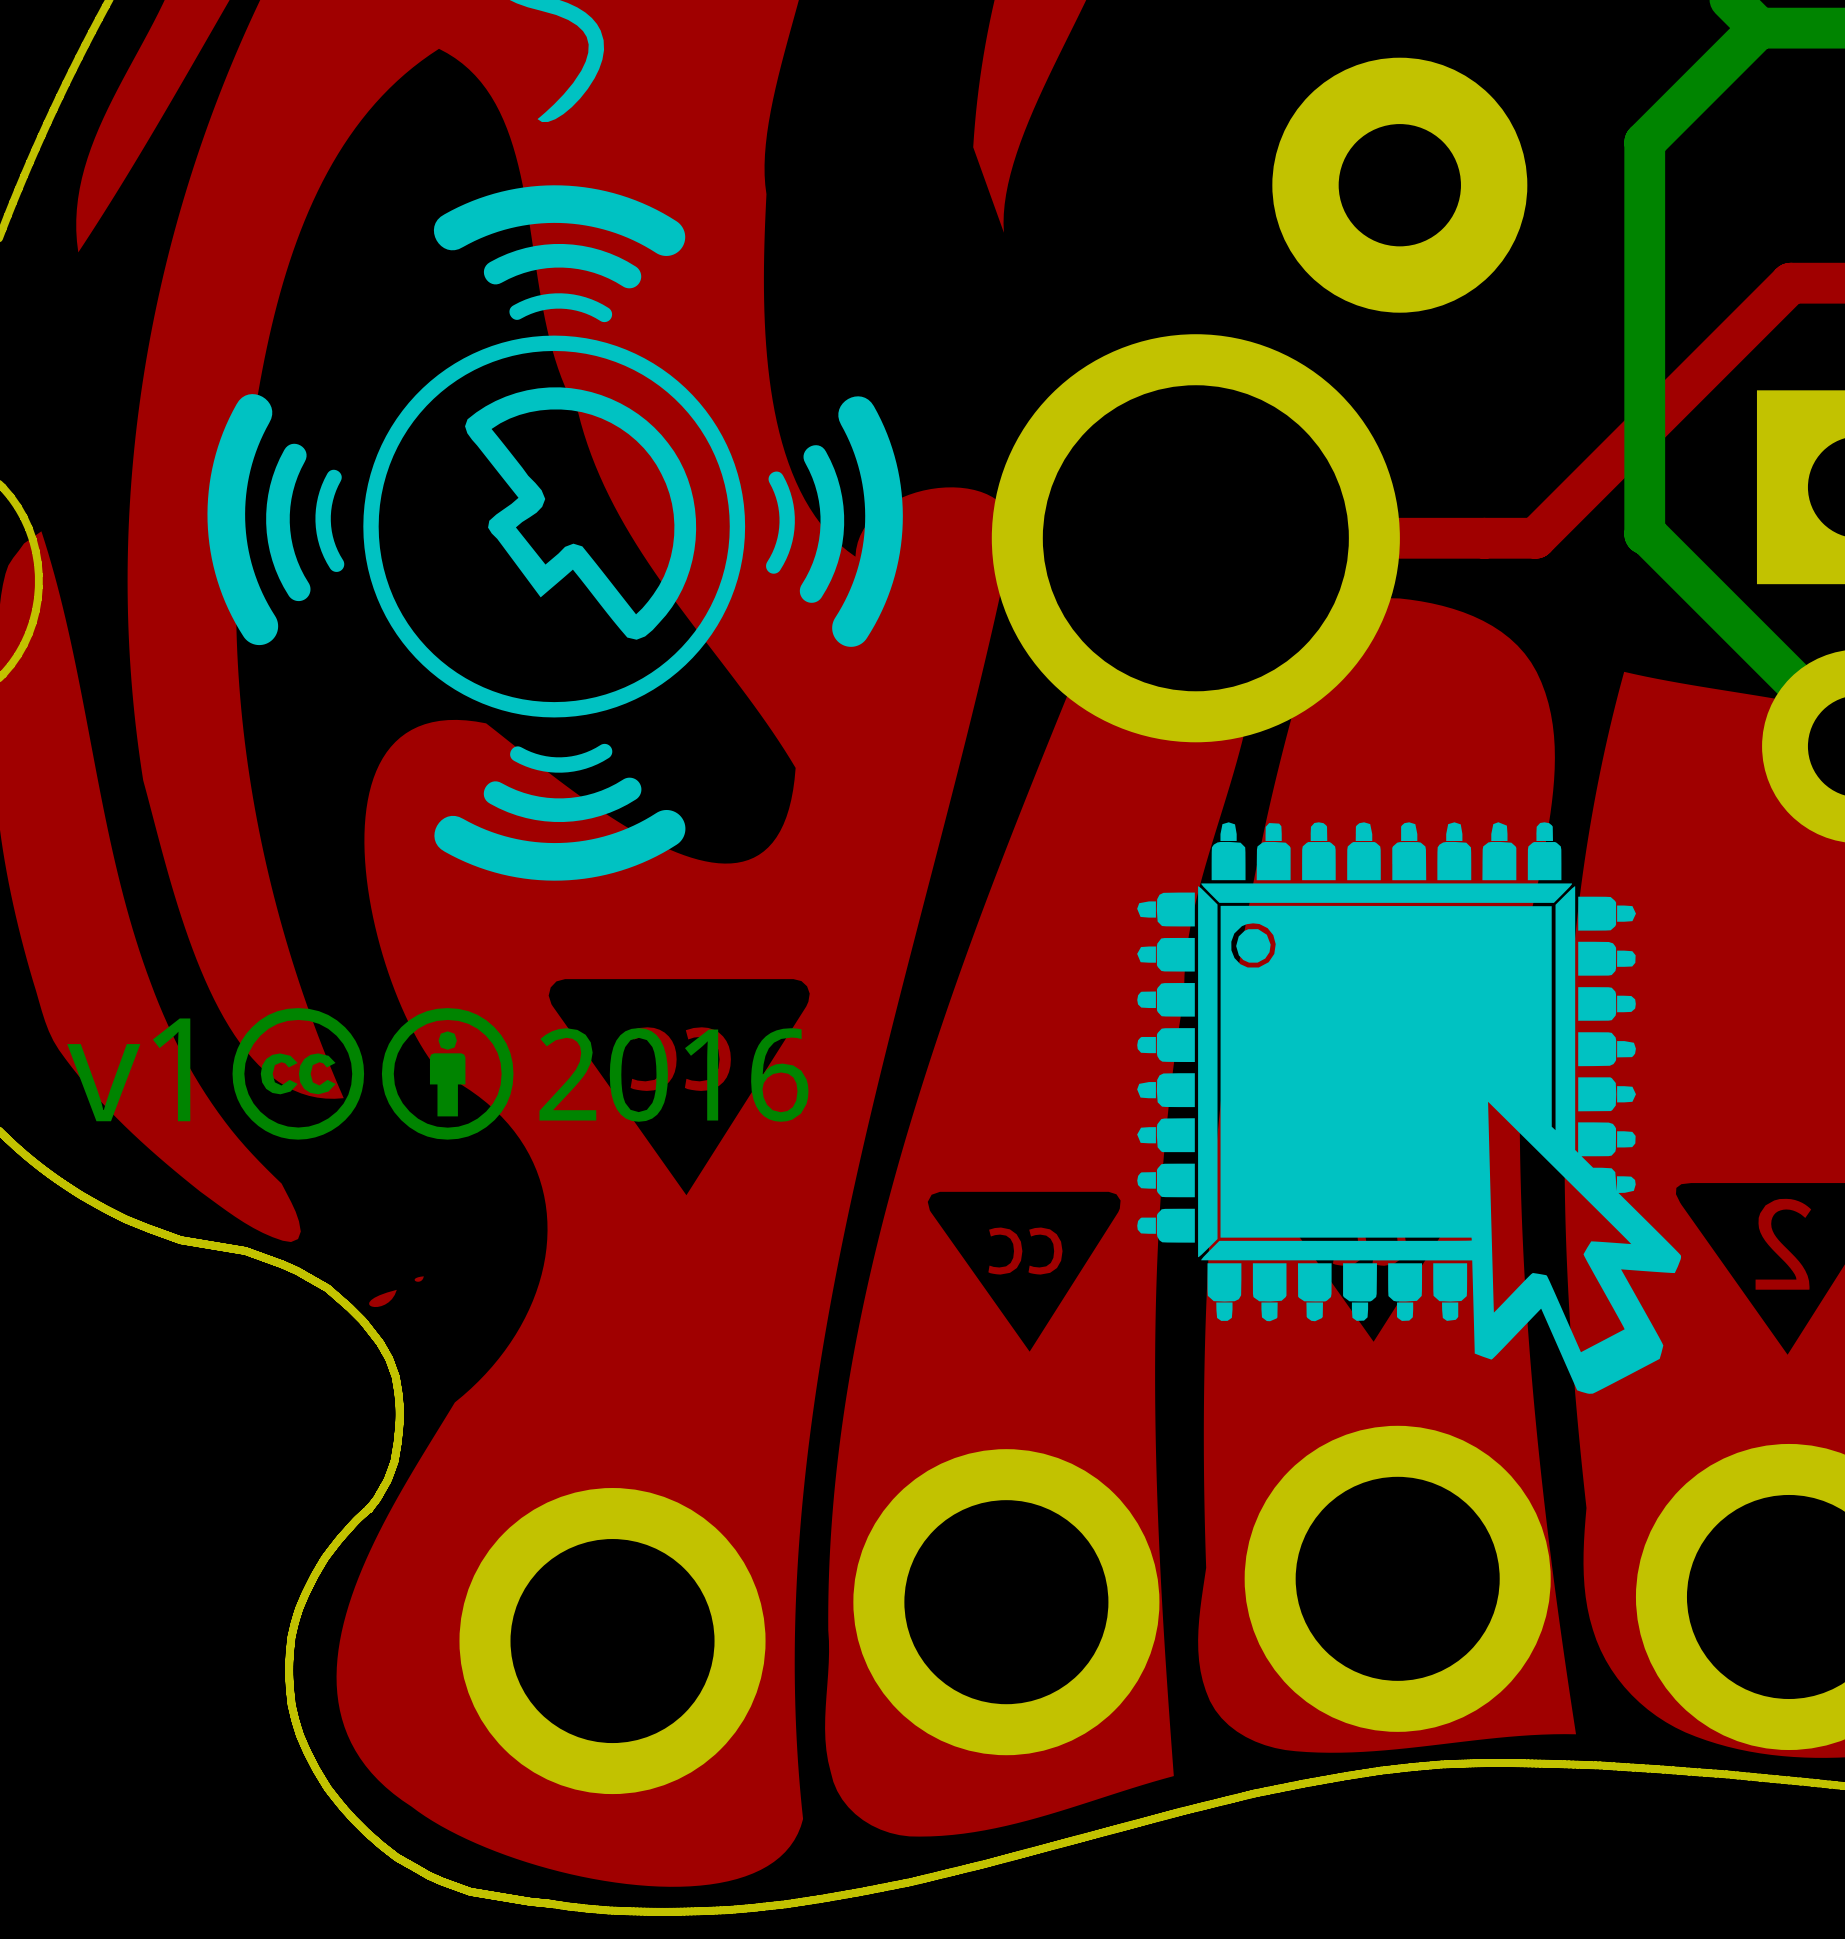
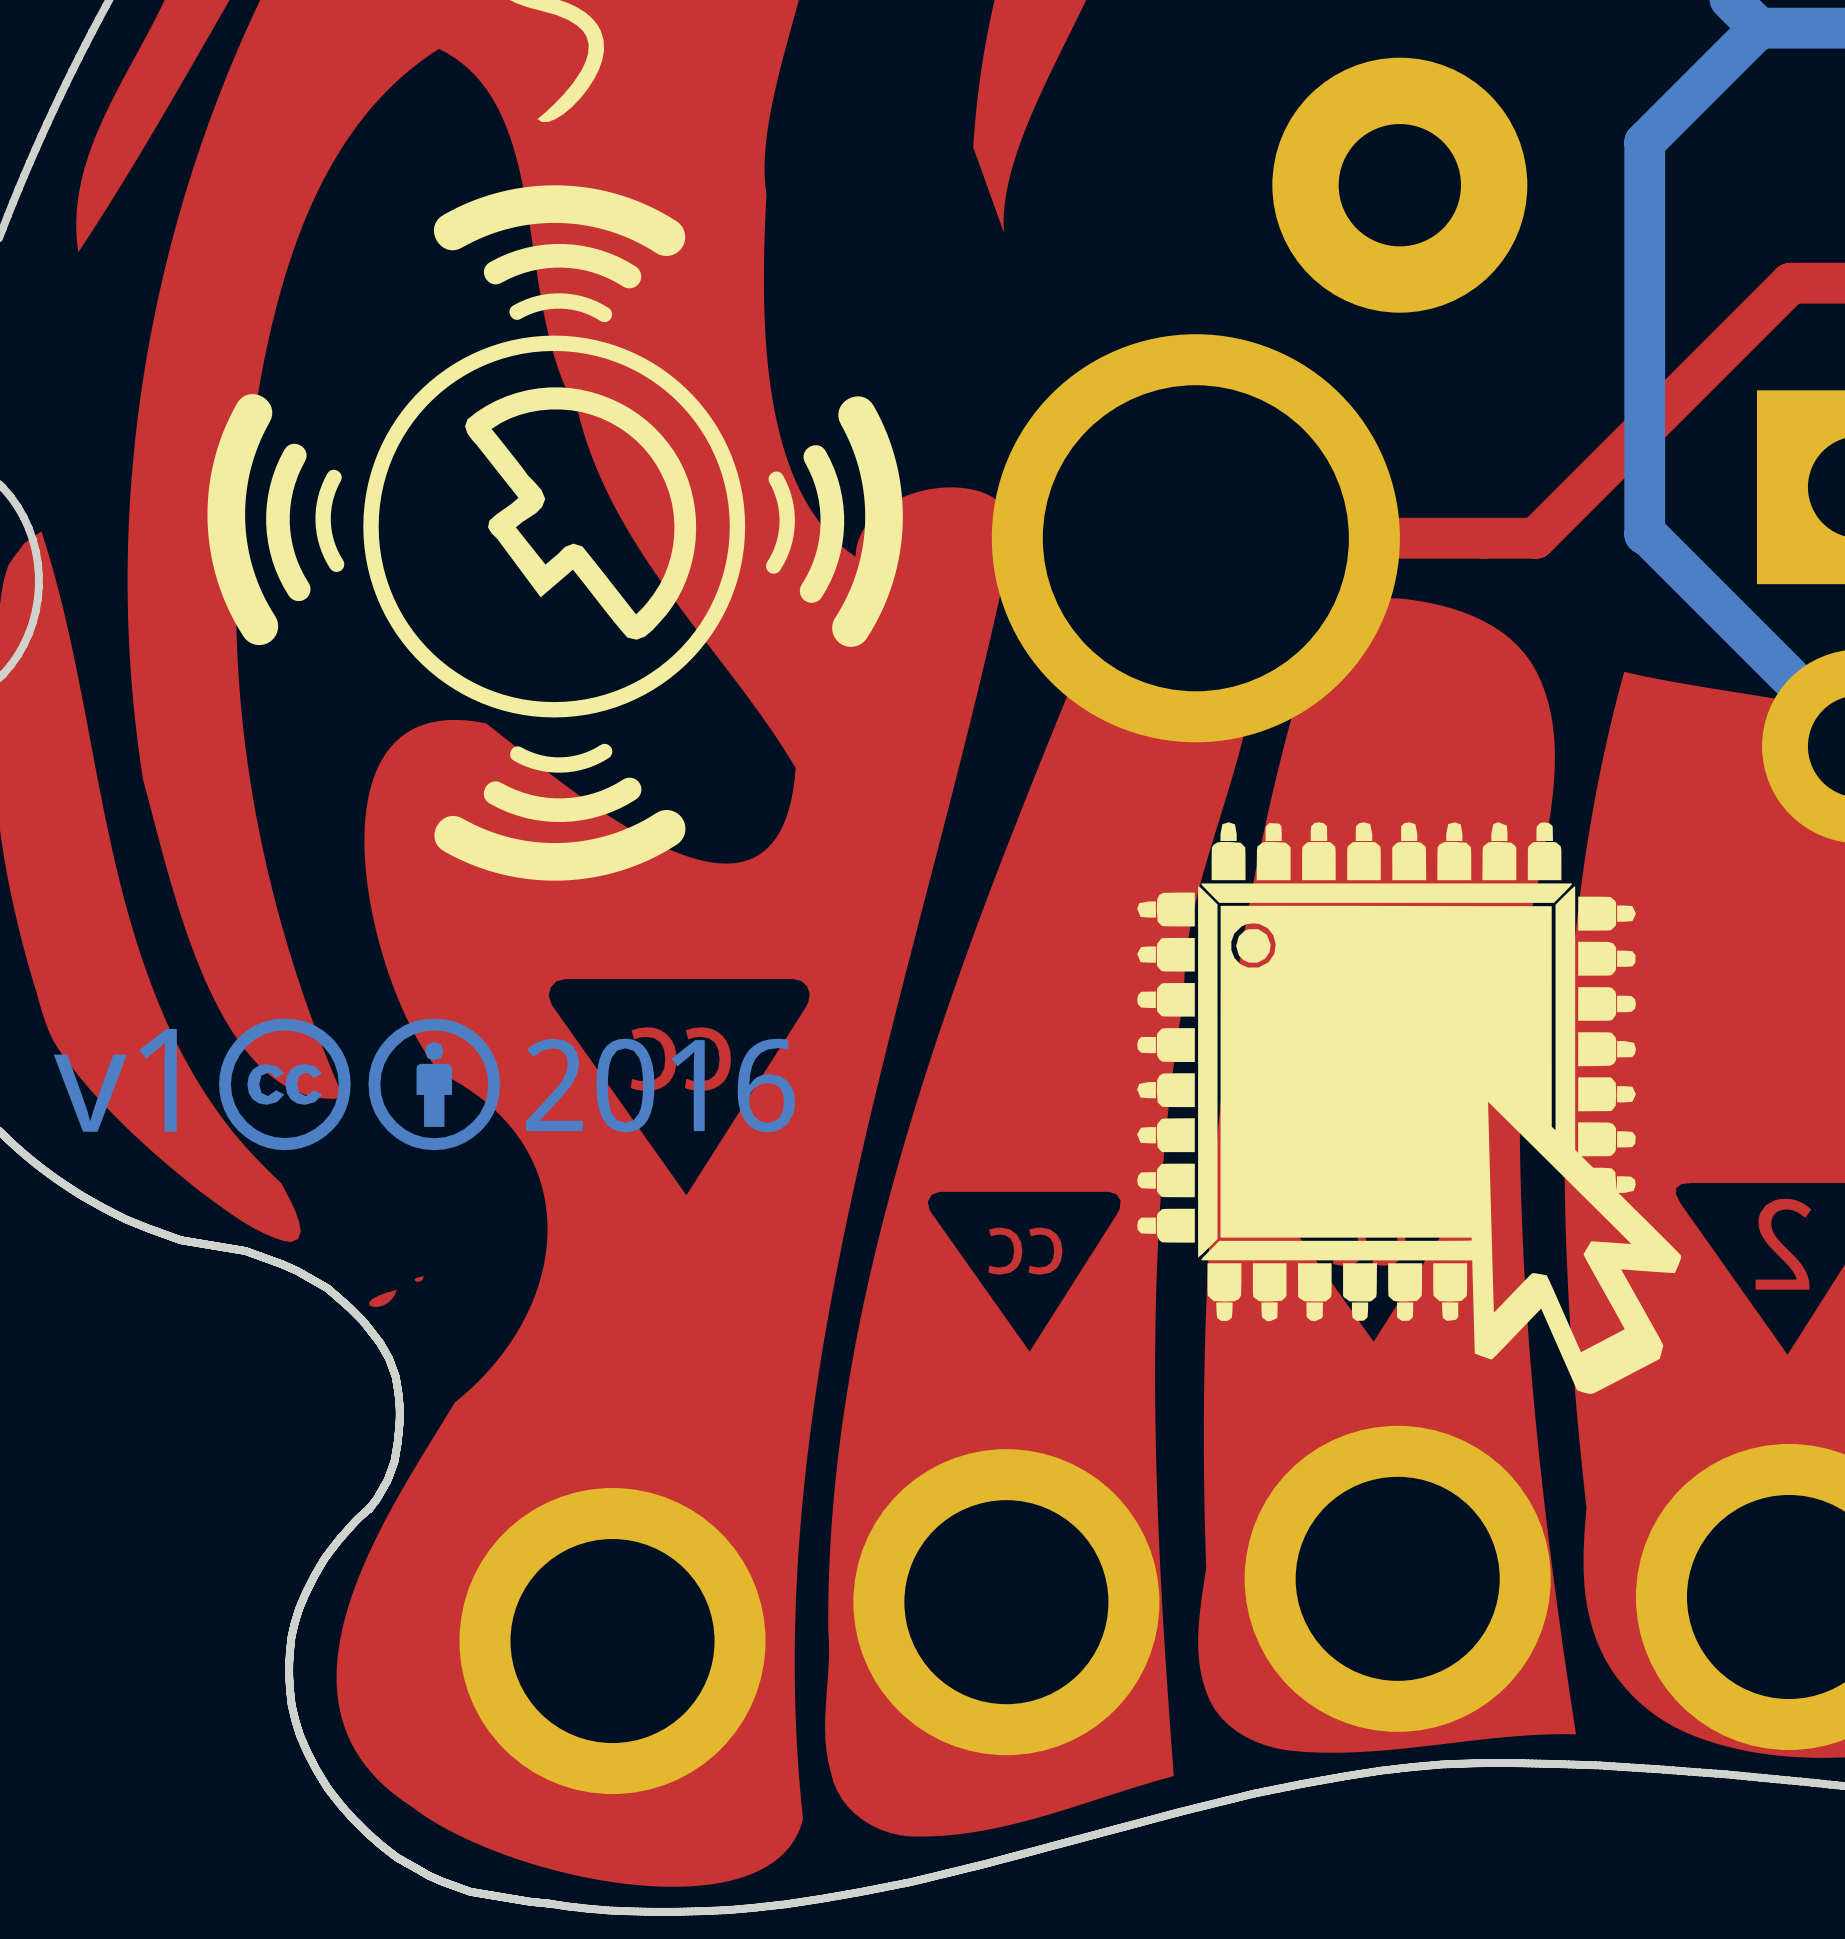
drawing position: (437, 1073) -> (424, 1084)

